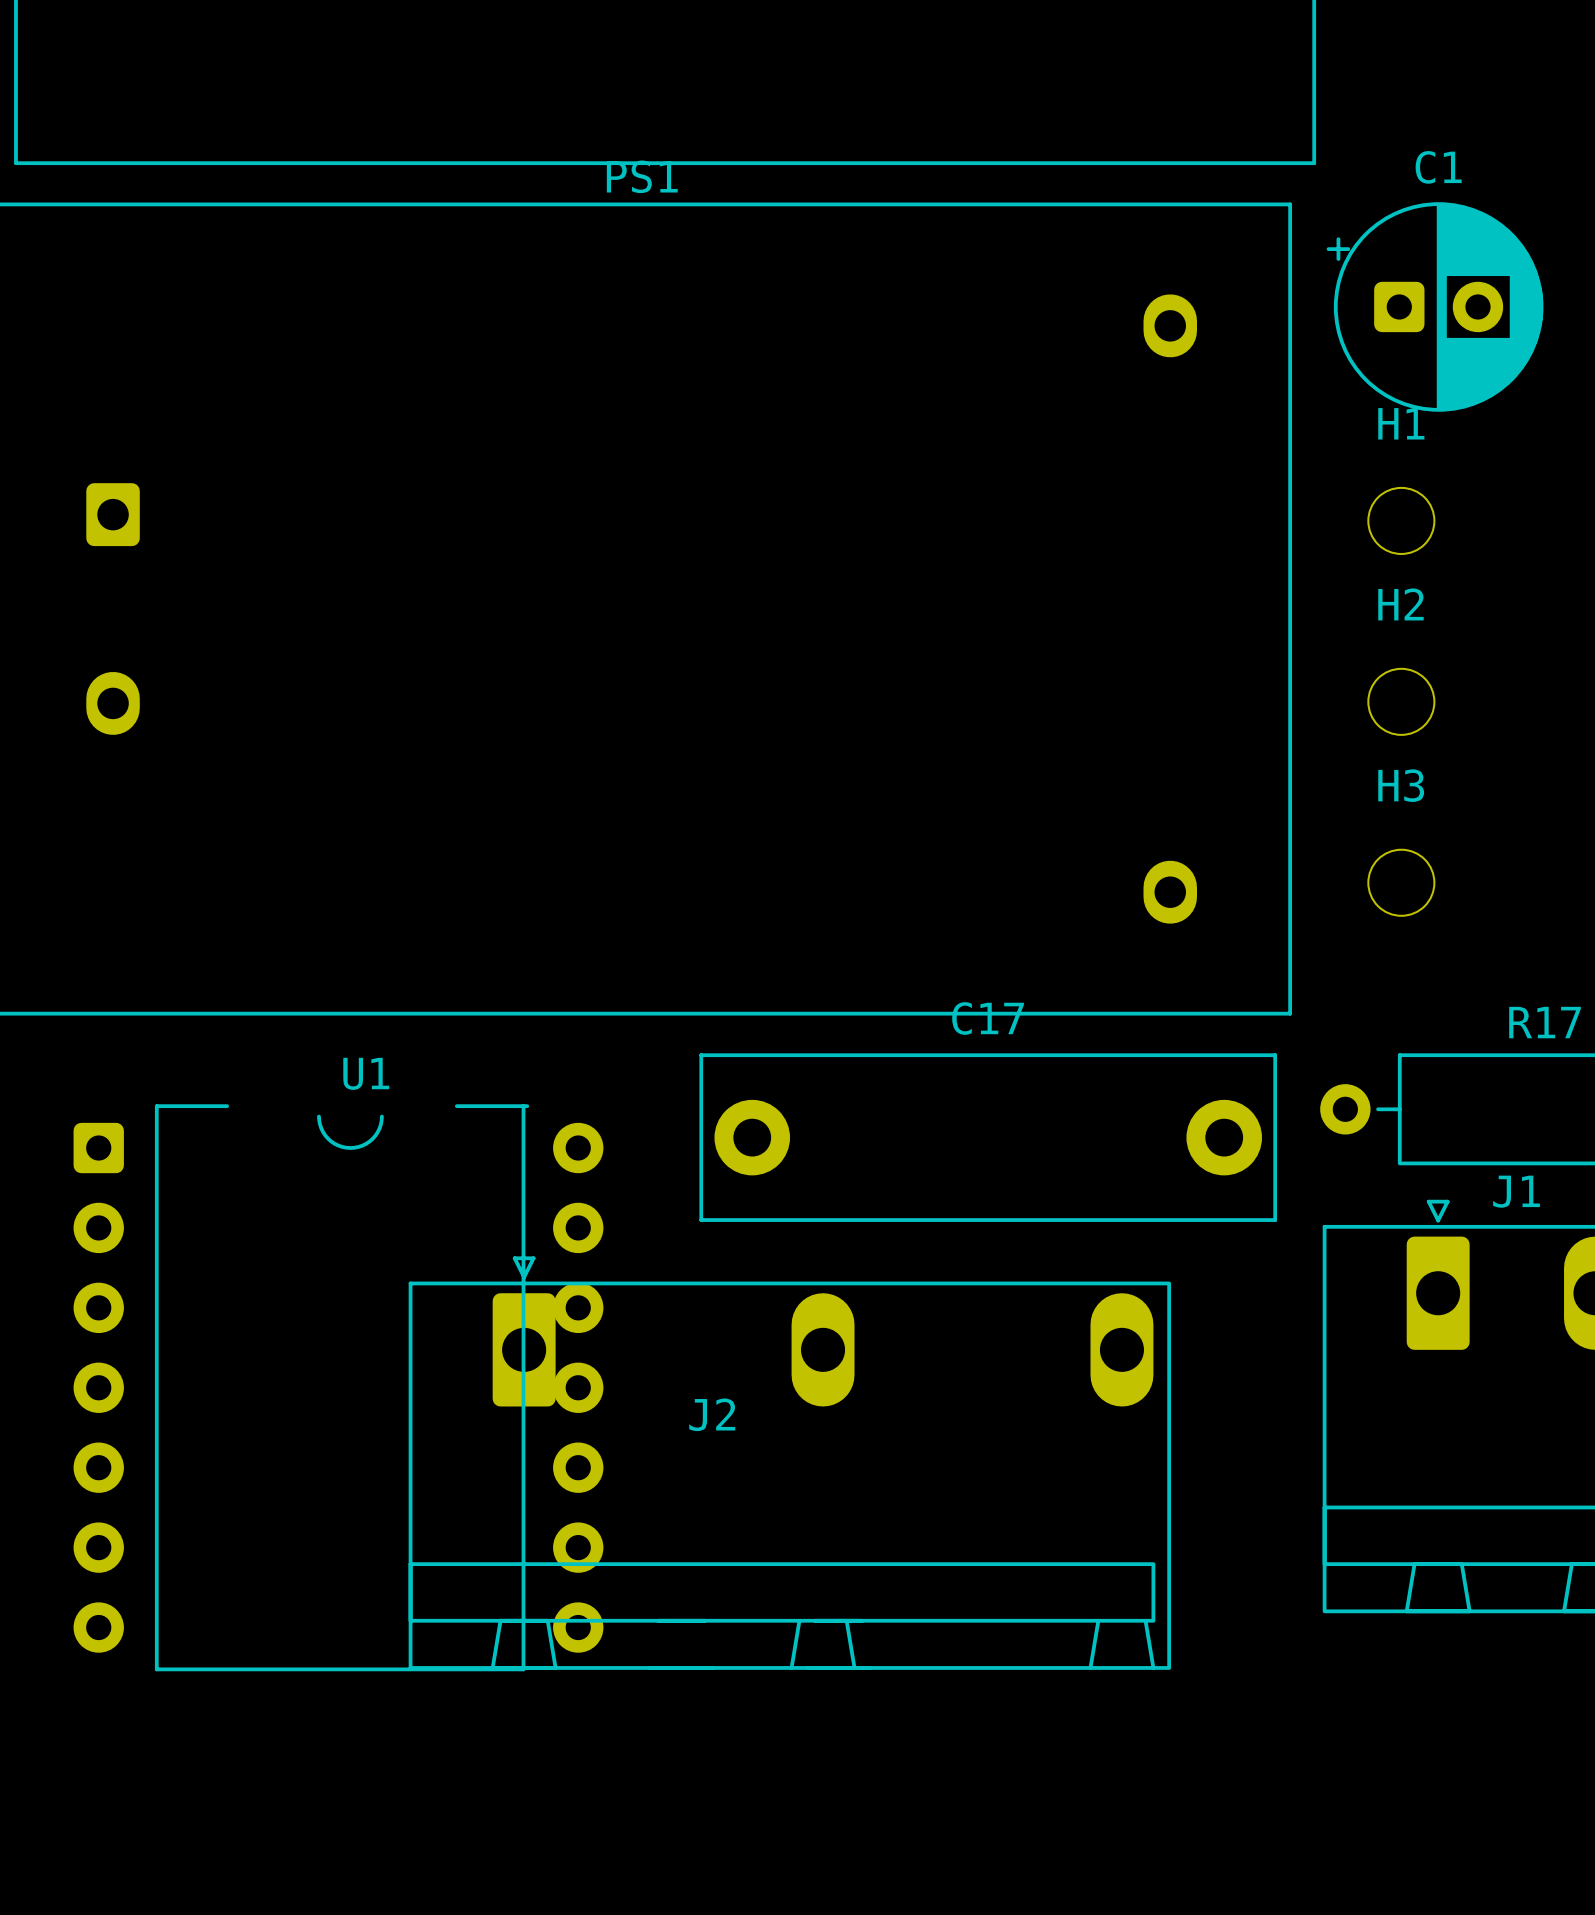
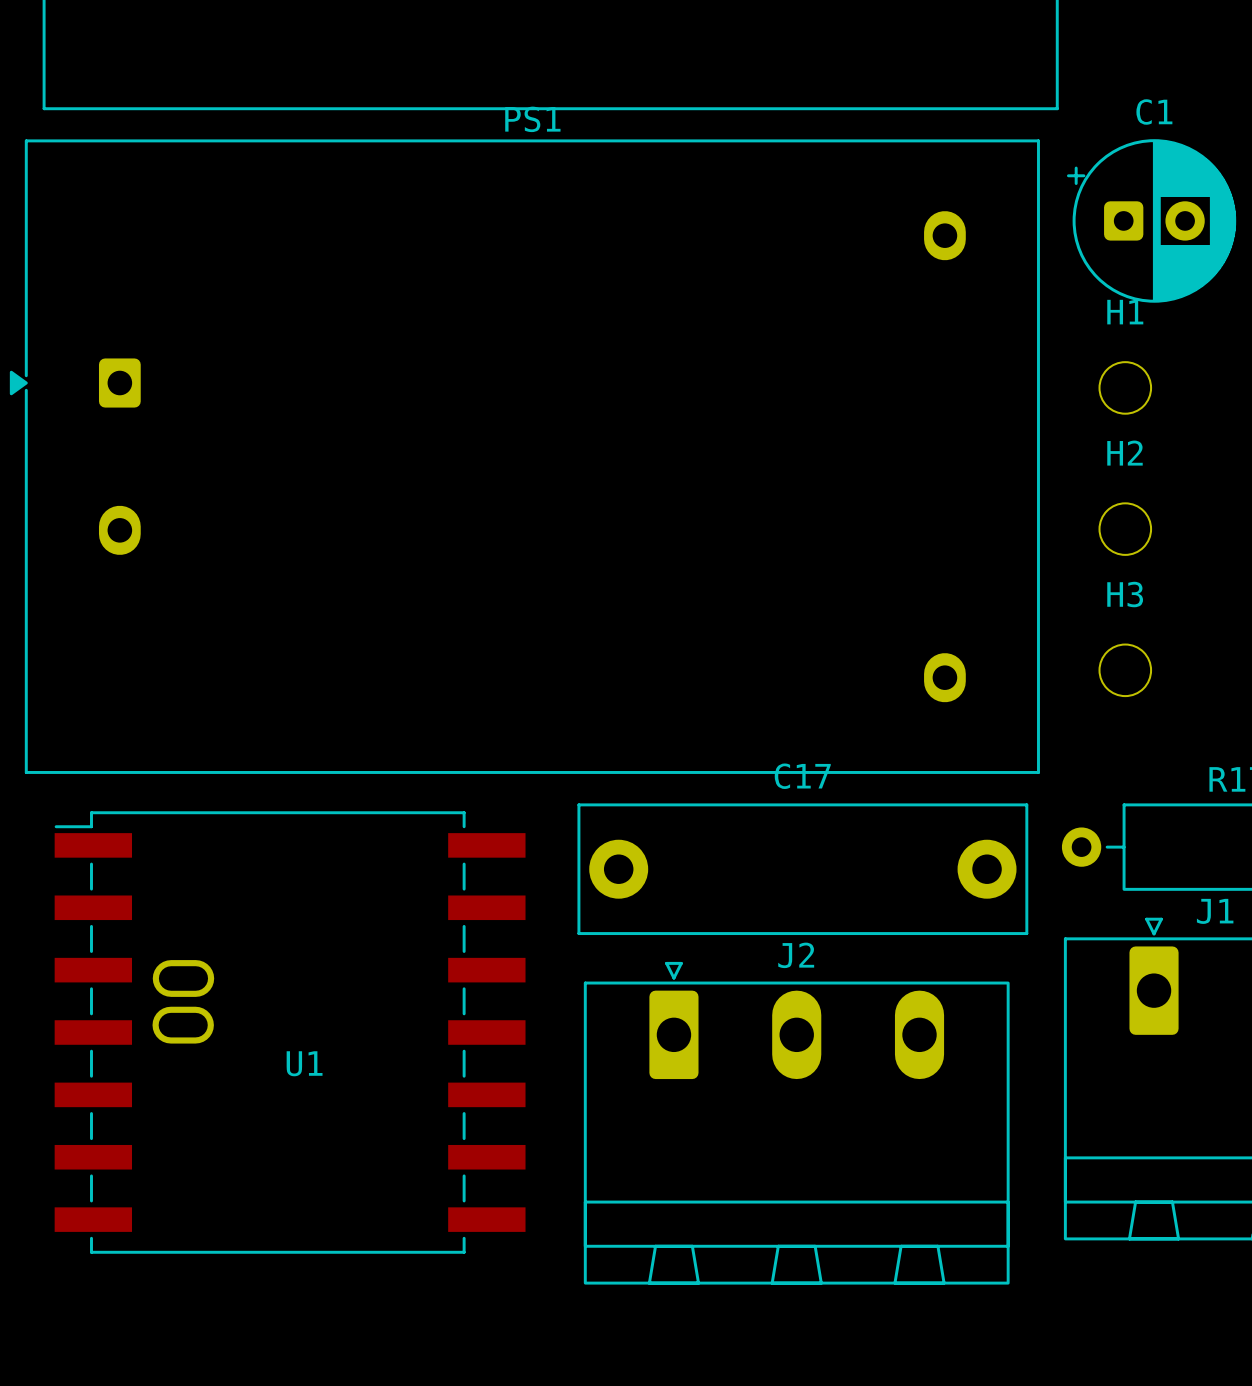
U1 name position: U1 (366, 1073) -> U1 (304, 1063)
U1 footprint: [73, 1104, 604, 1672] -> [54, 811, 526, 1254]
J2 footprint: [408, 1256, 1172, 1670] -> [583, 961, 1010, 1285]
J2 name position: J2 (712, 1414) -> J2 (796, 955)

